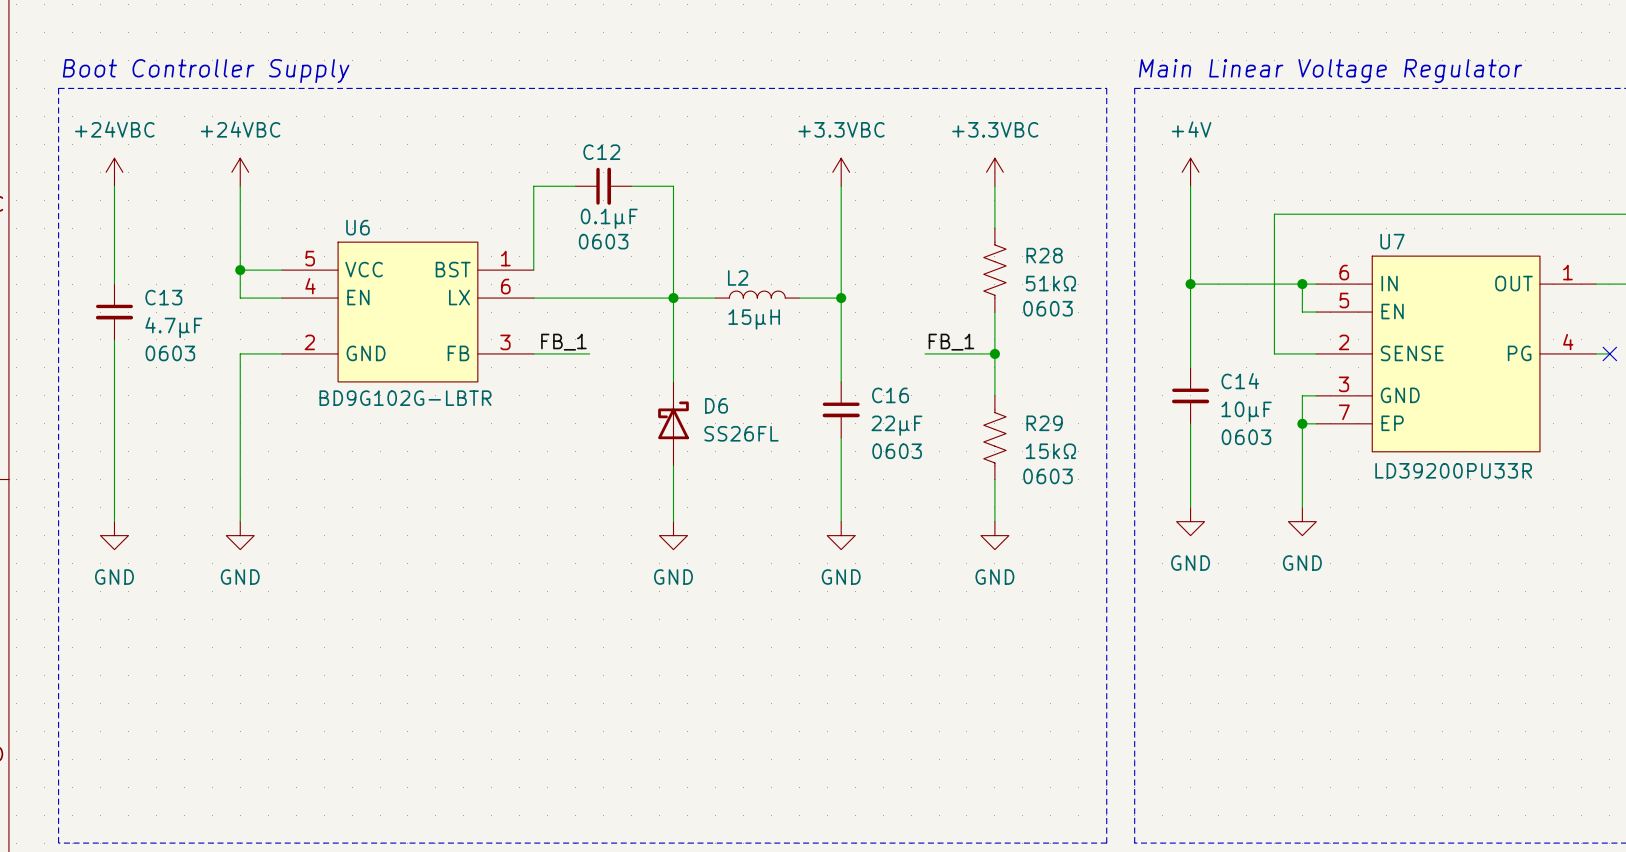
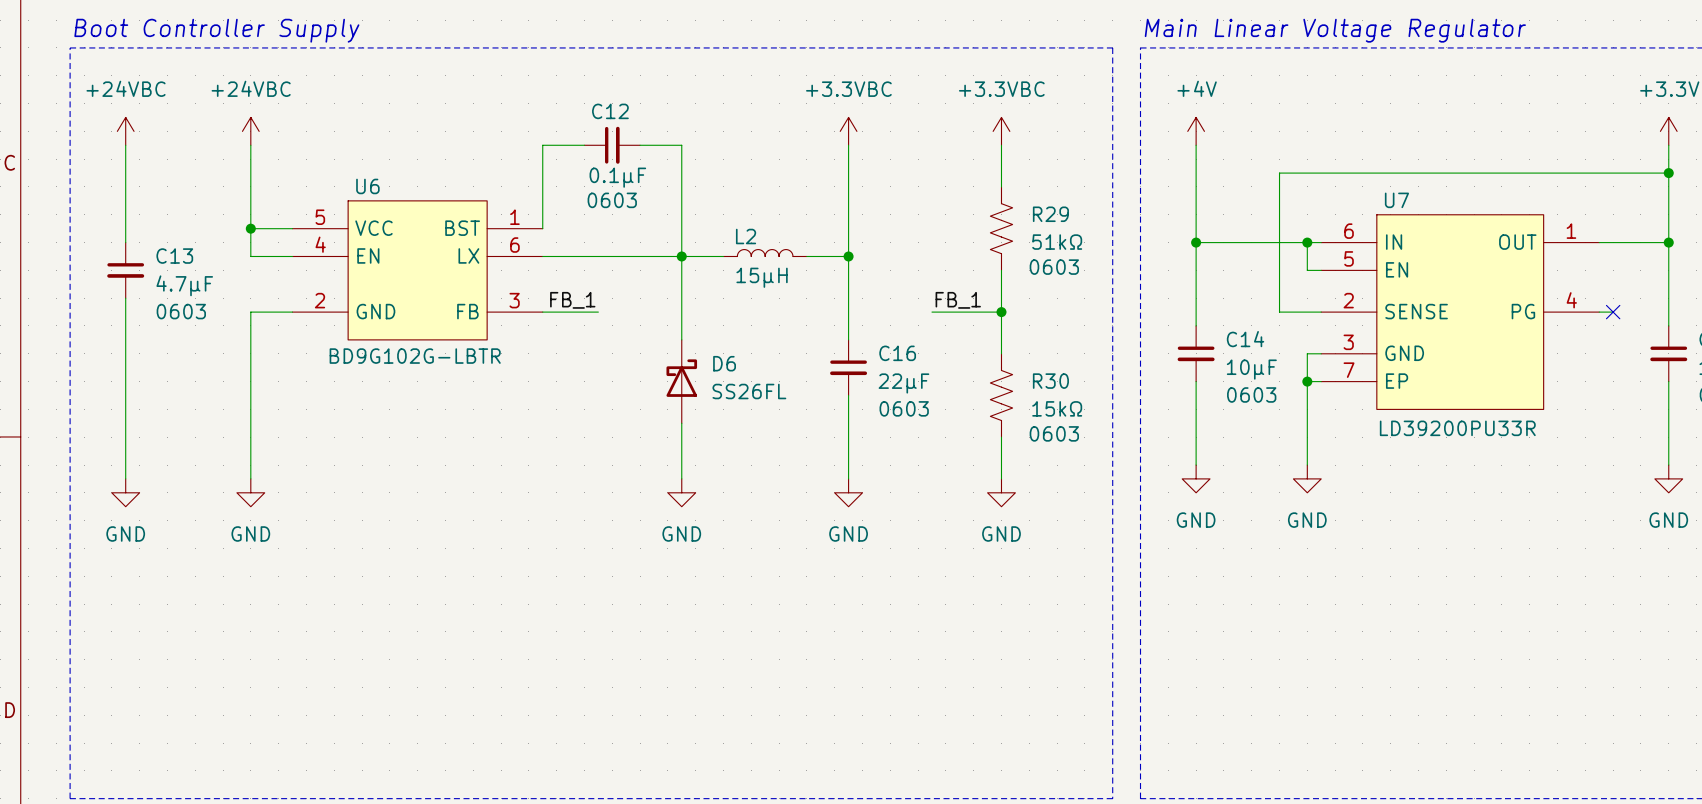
R28 name: R28 (1044, 255) -> R29 (1050, 214)
R29 name: R29 (1044, 423) -> R30 (1050, 381)

